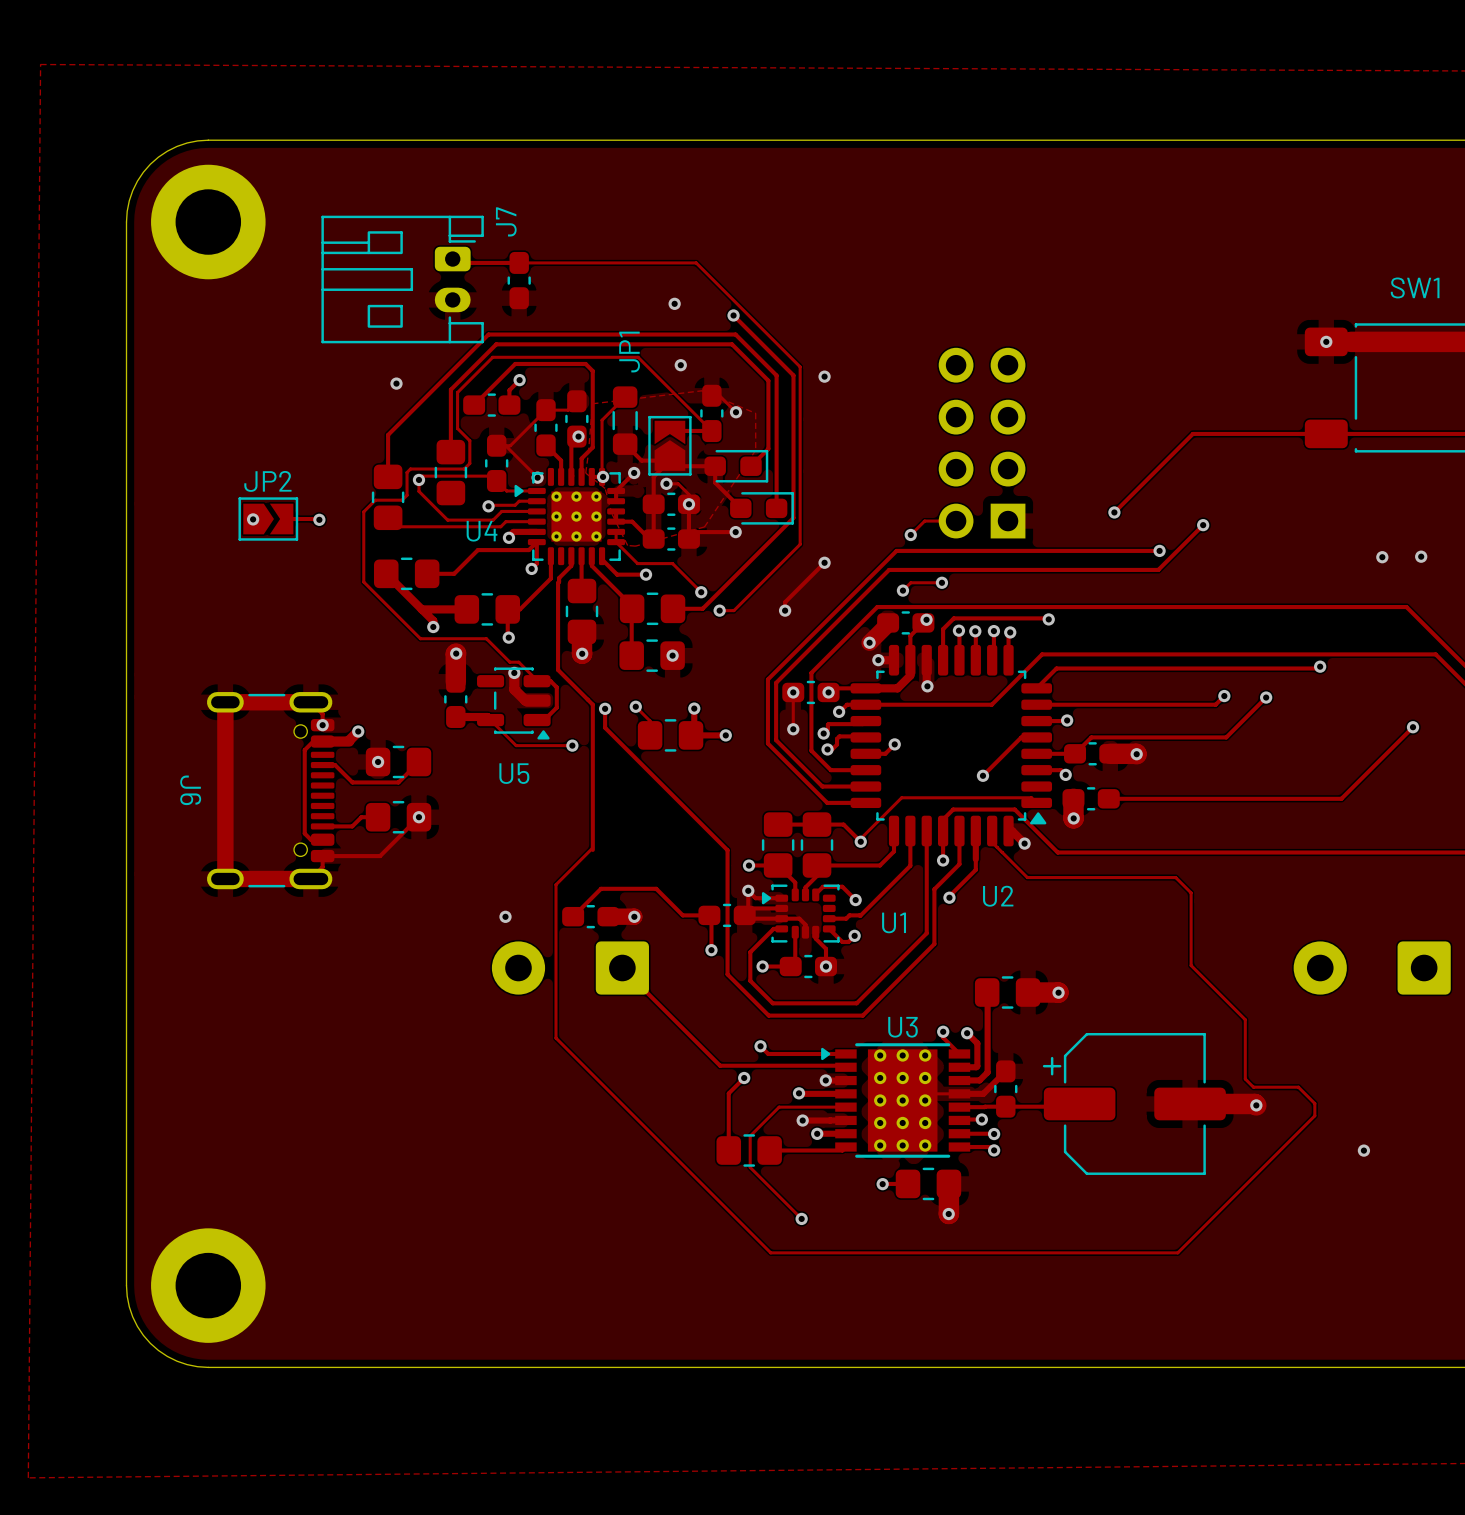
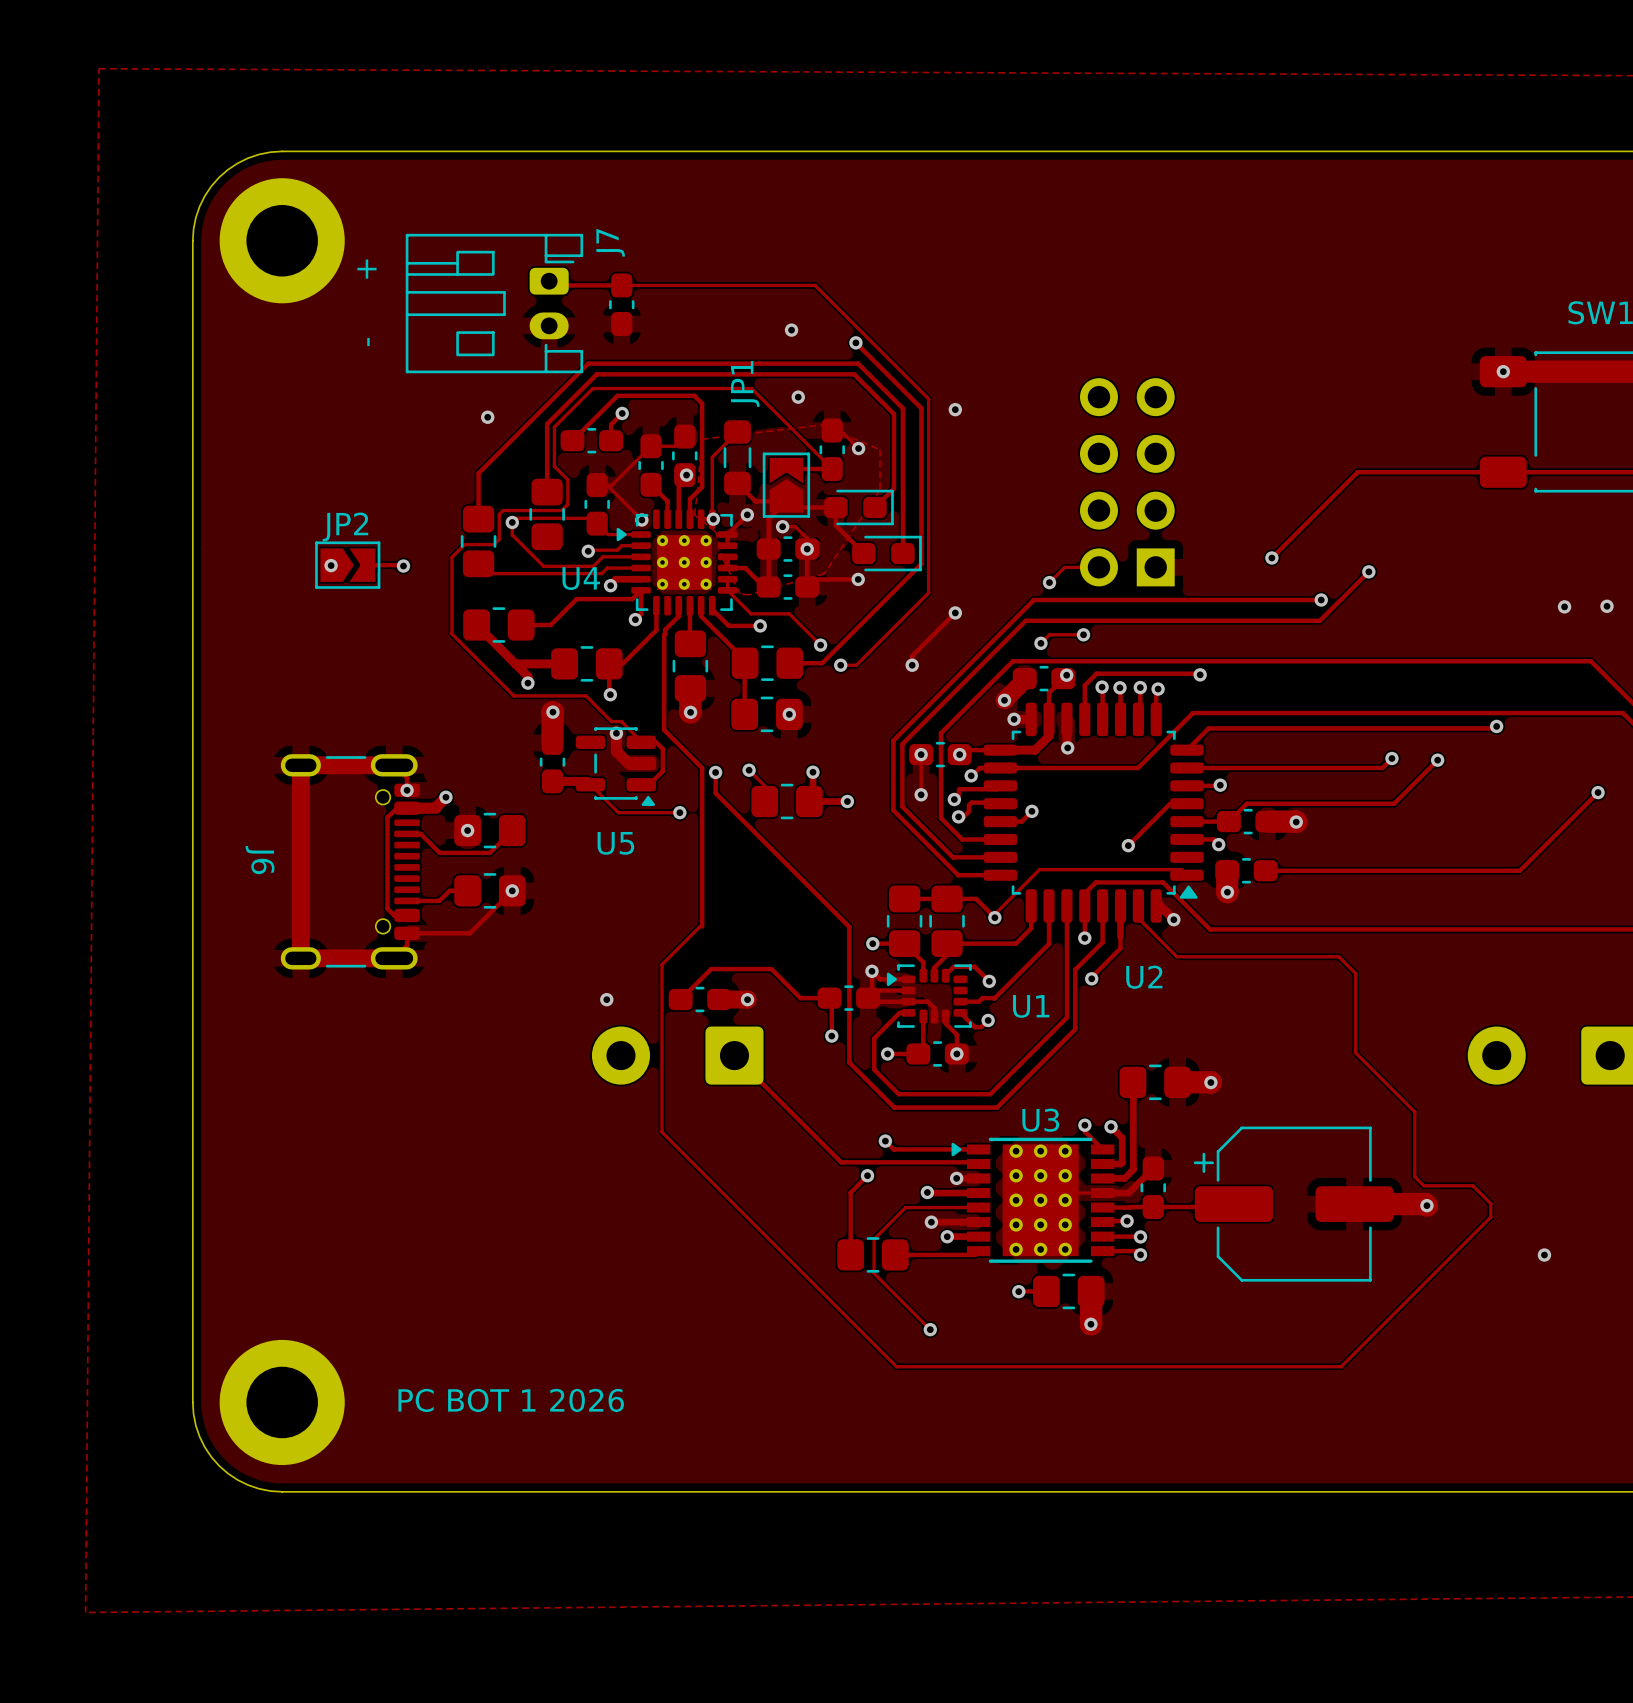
text: none -> + (366, 269)
text: none -> - (368, 342)
text: none -> PC BOT 1 2026 (511, 1400)

